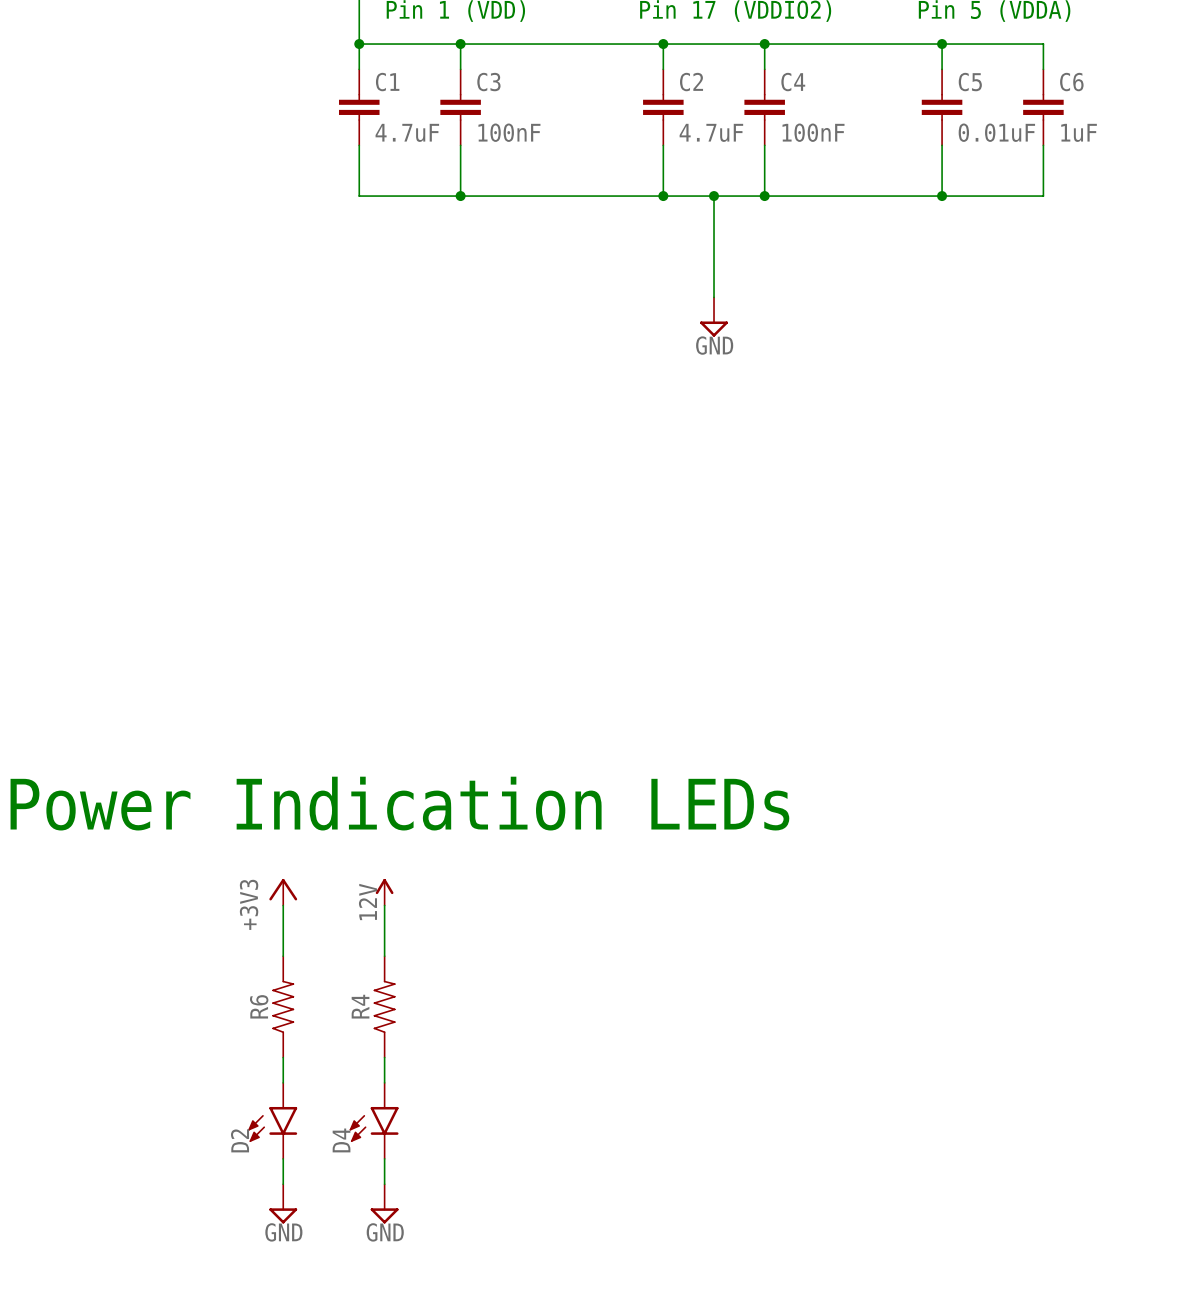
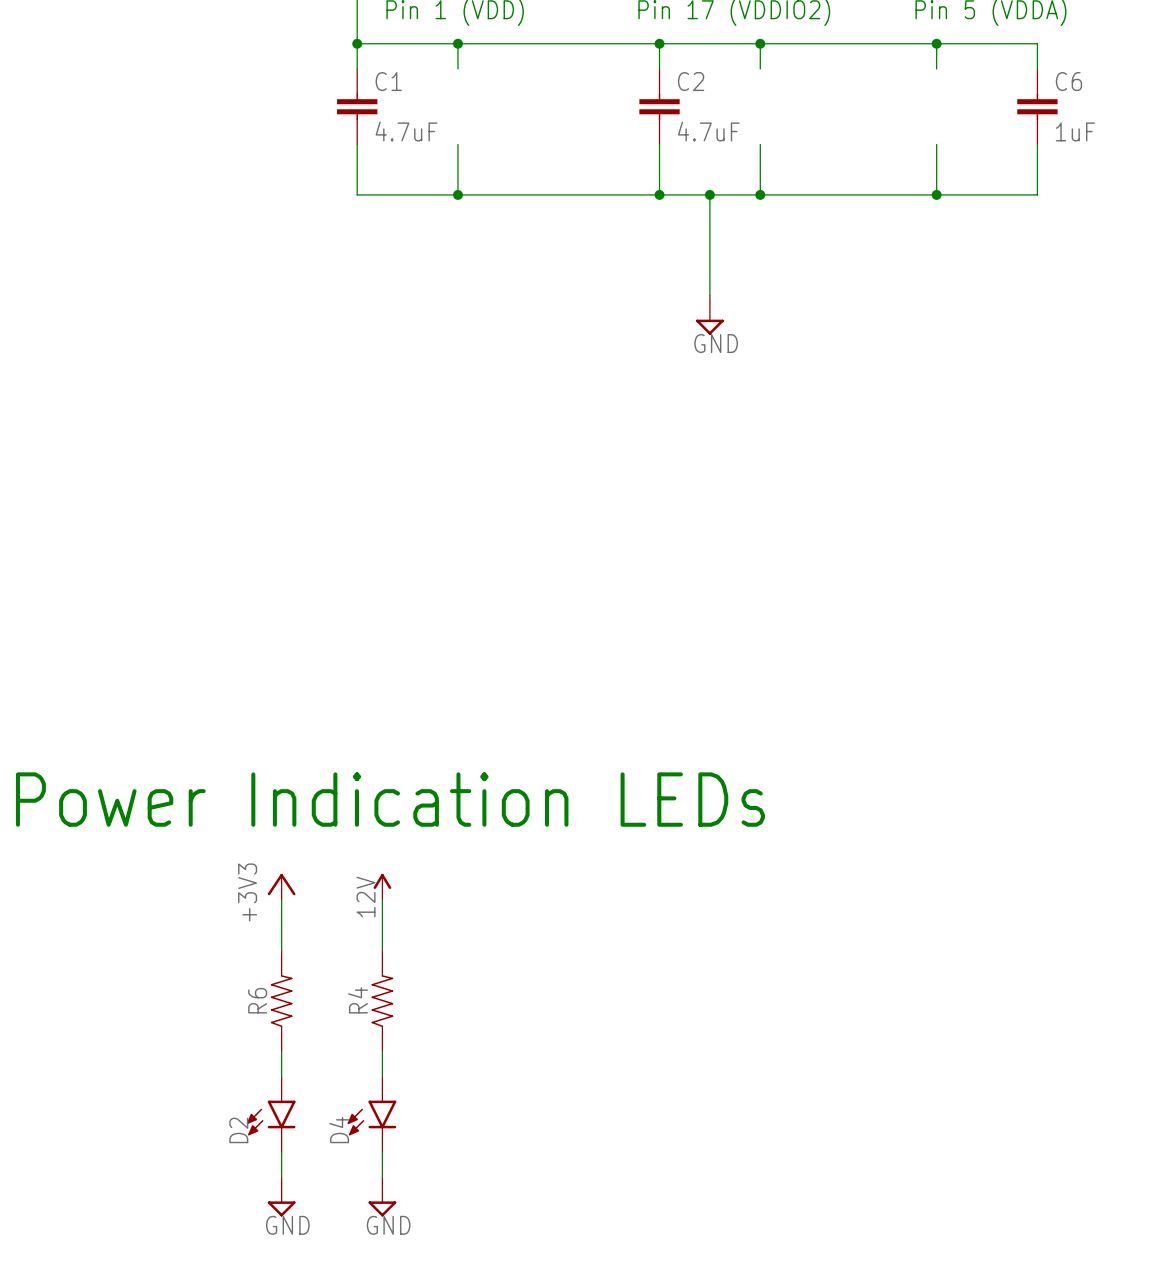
C3: 100nF (460, 107) -> none
C4: 100nF (764, 107) -> none
C5: 0.01uF (942, 107) -> none

